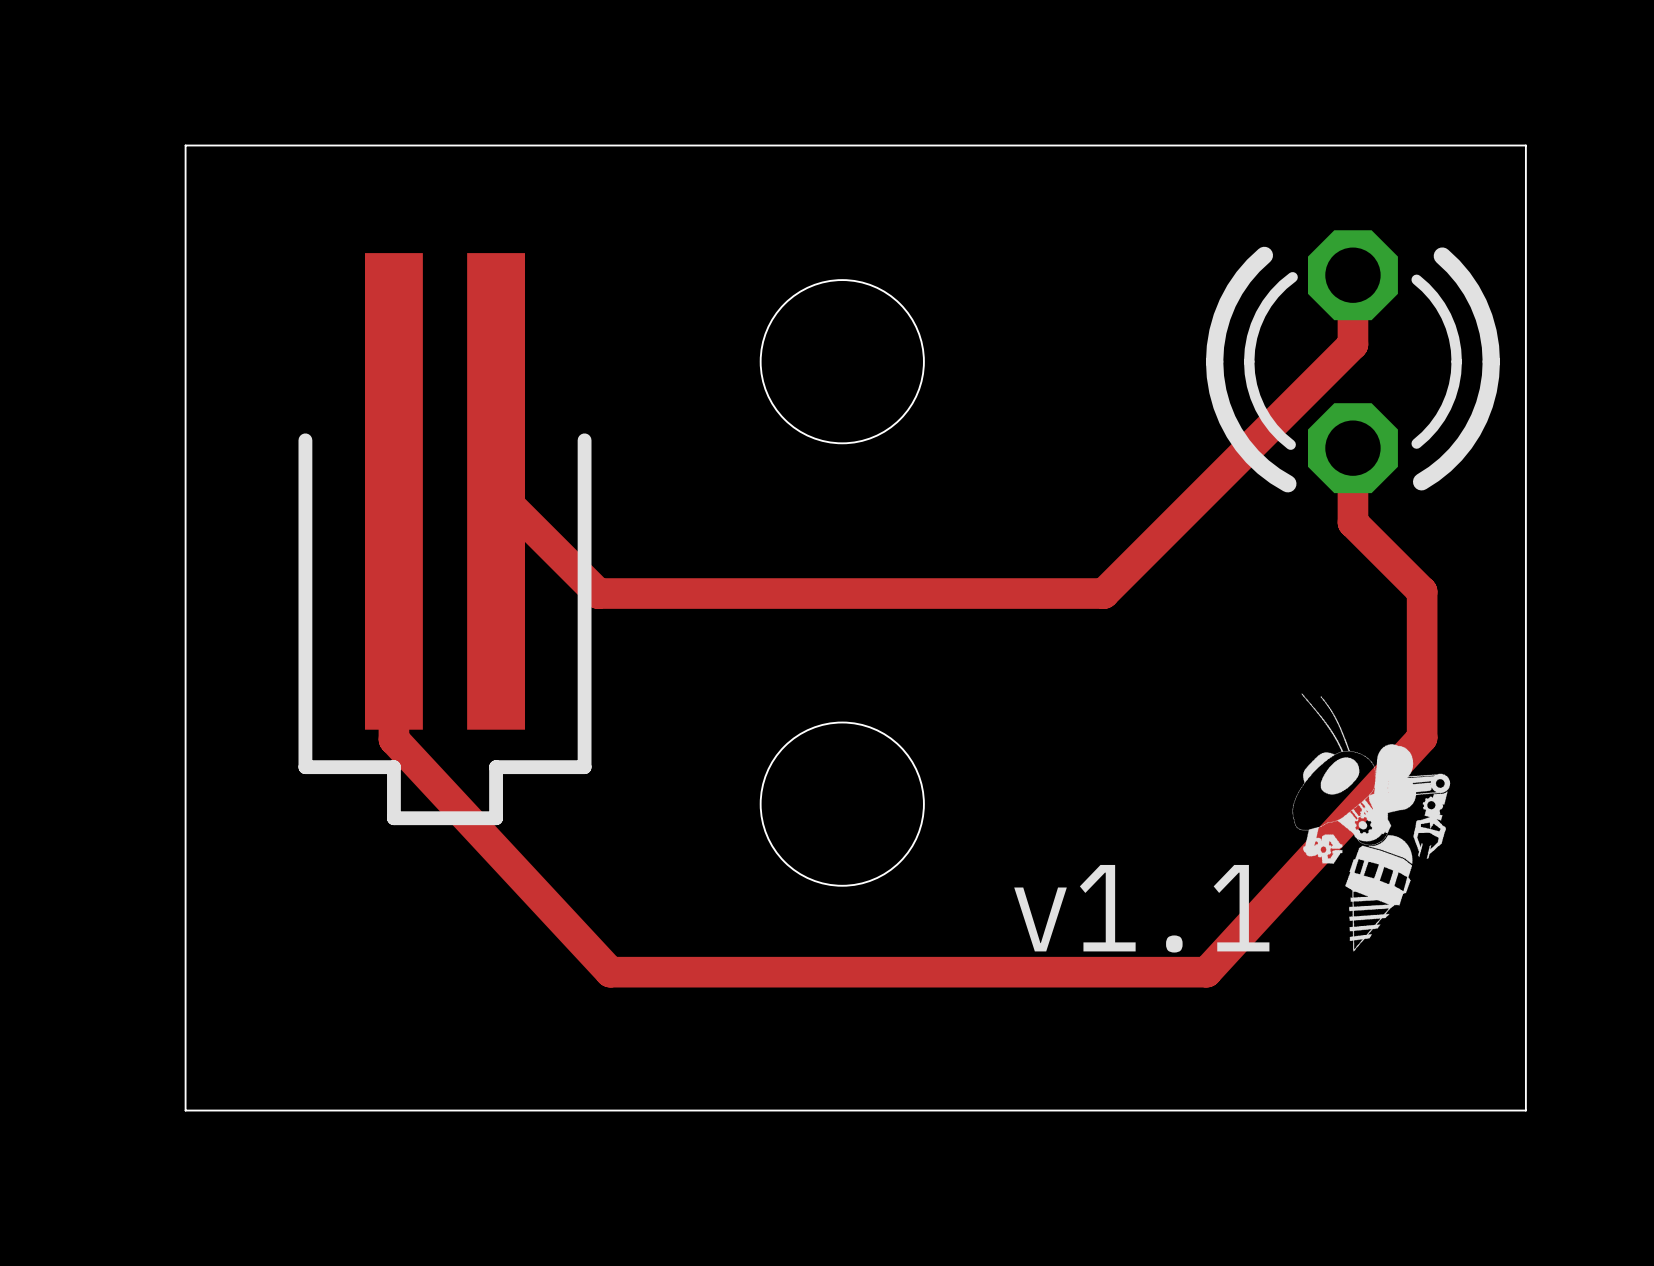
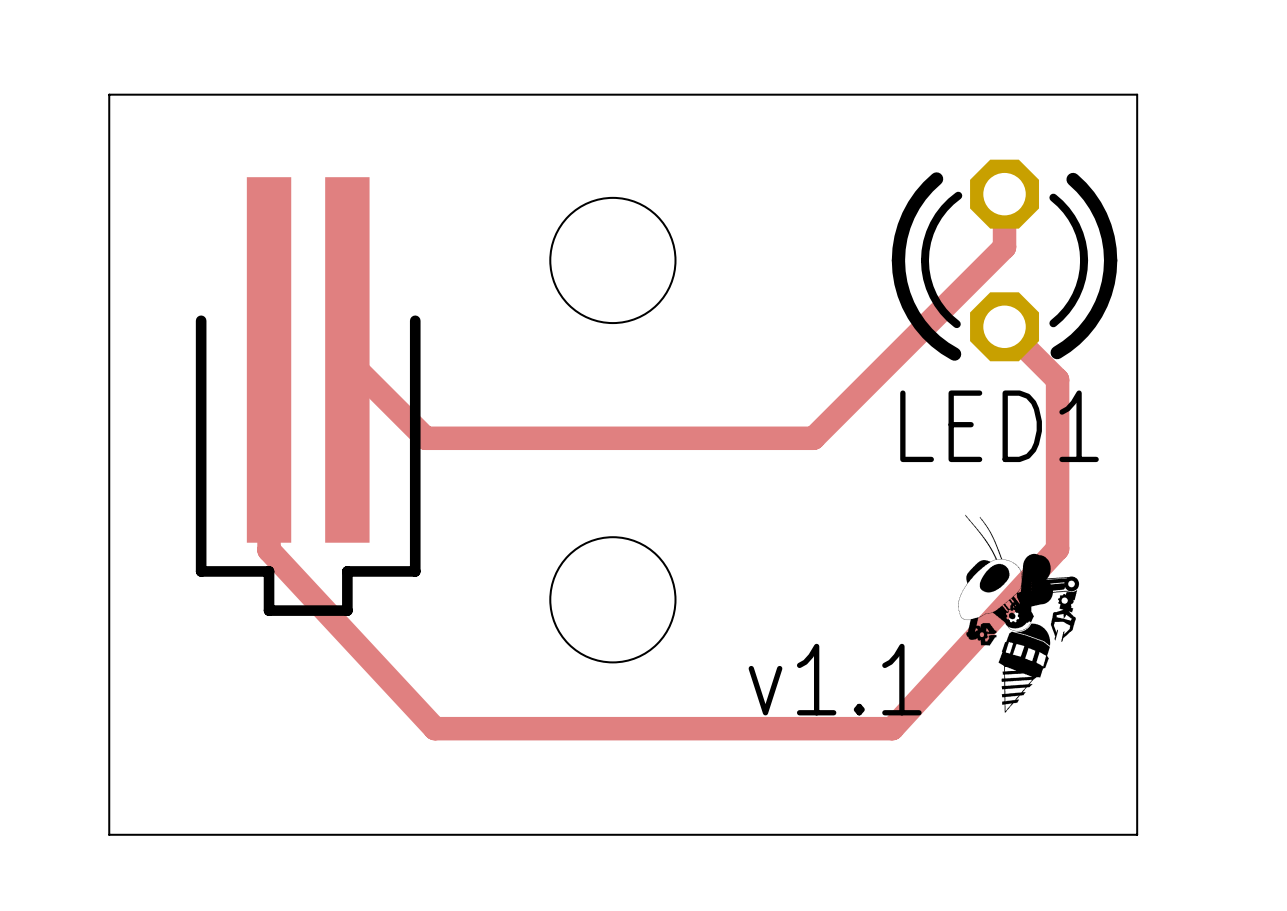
track: (1352, 448) (1352, 522) (1422, 591) -> (1004, 326) (1057, 379) (1057, 436)
LED1 name: none -> LED1 (999, 426)

